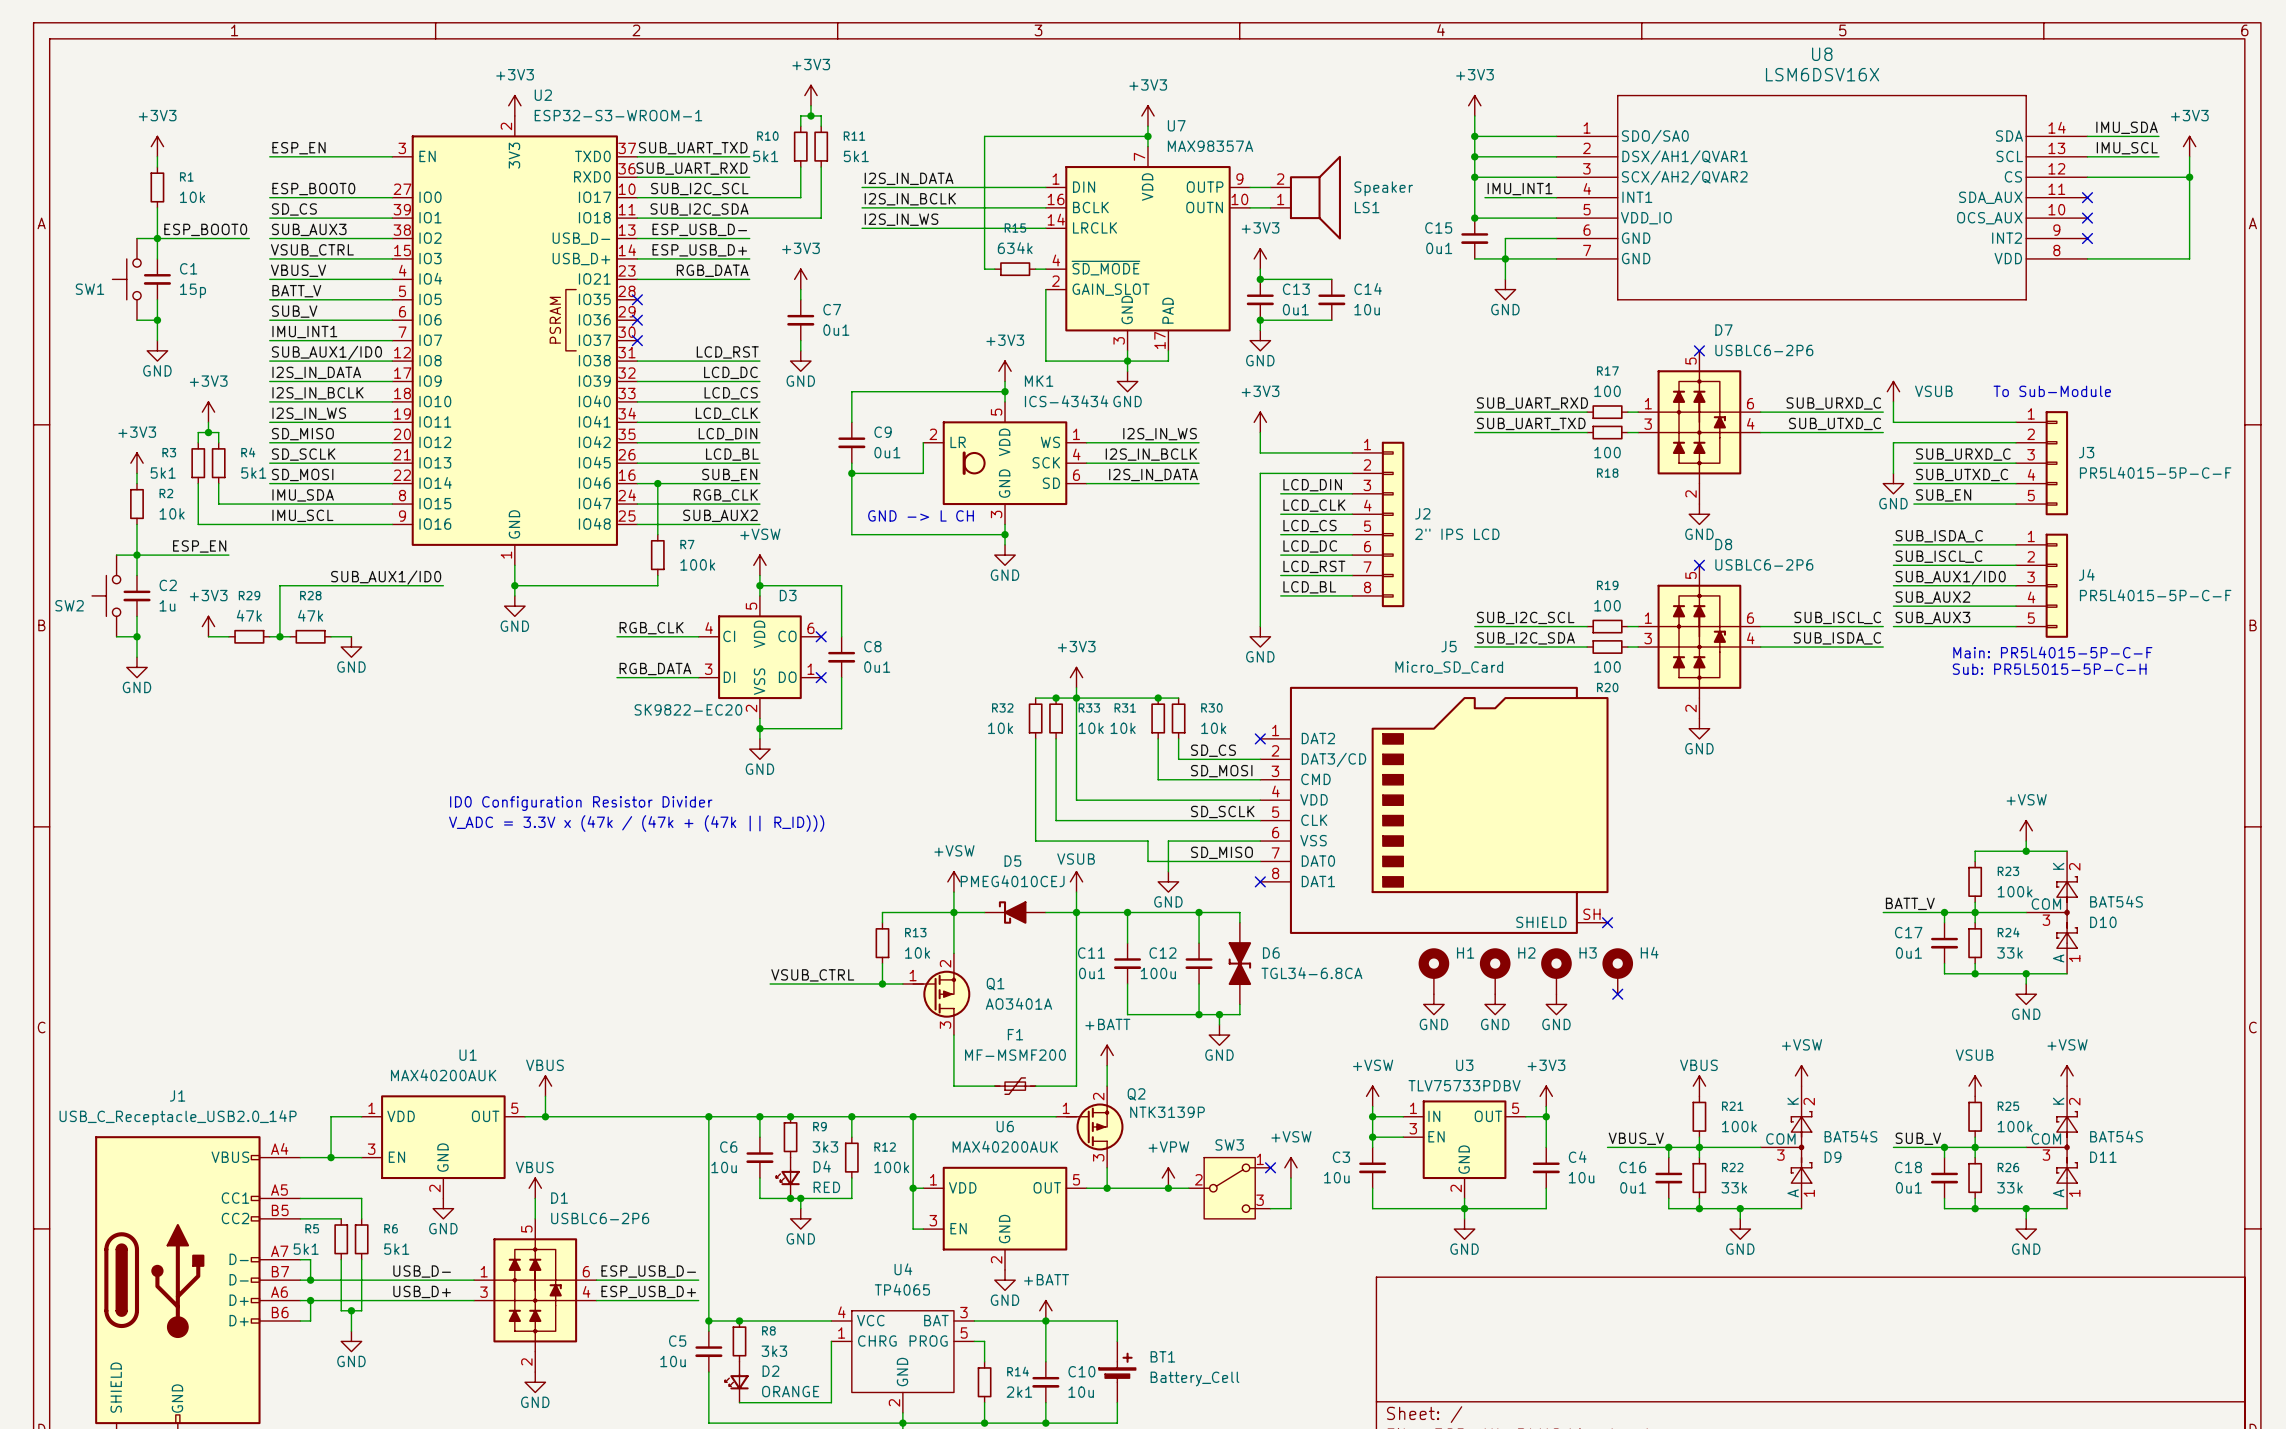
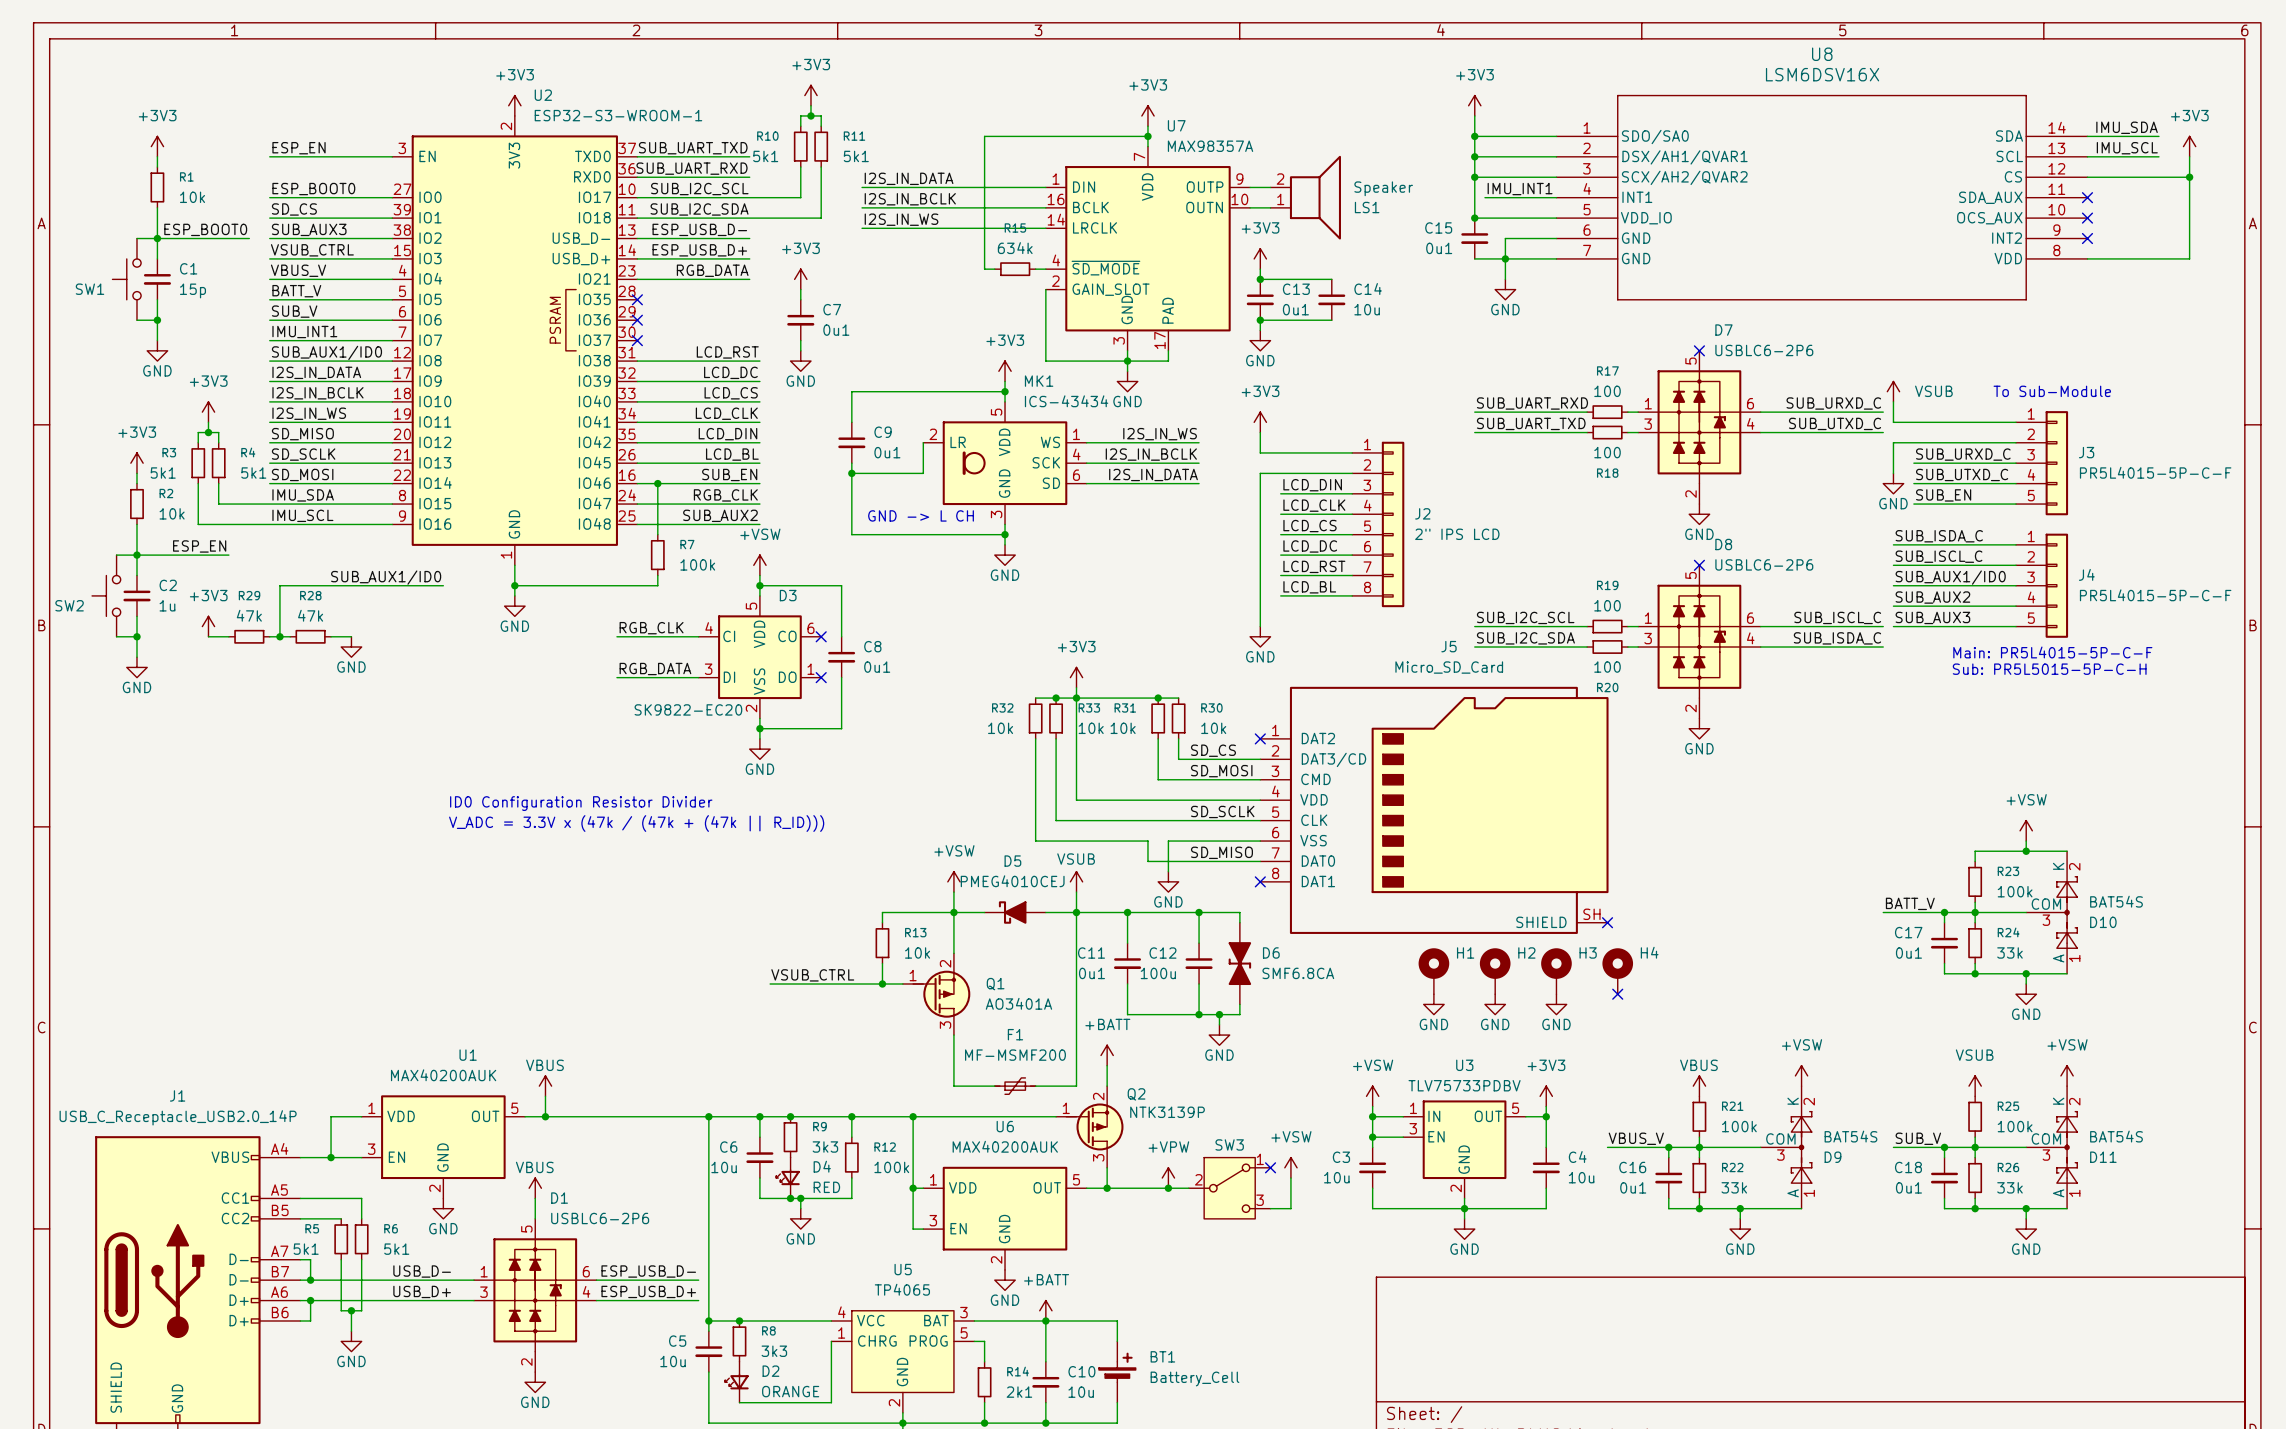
D6 value: TGL34-6.8CA (1311, 973) -> SMF6.8CA (1298, 973)
U4: TP4065 (902, 1361) -> none
U5: none -> TP4065 (902, 1361)

